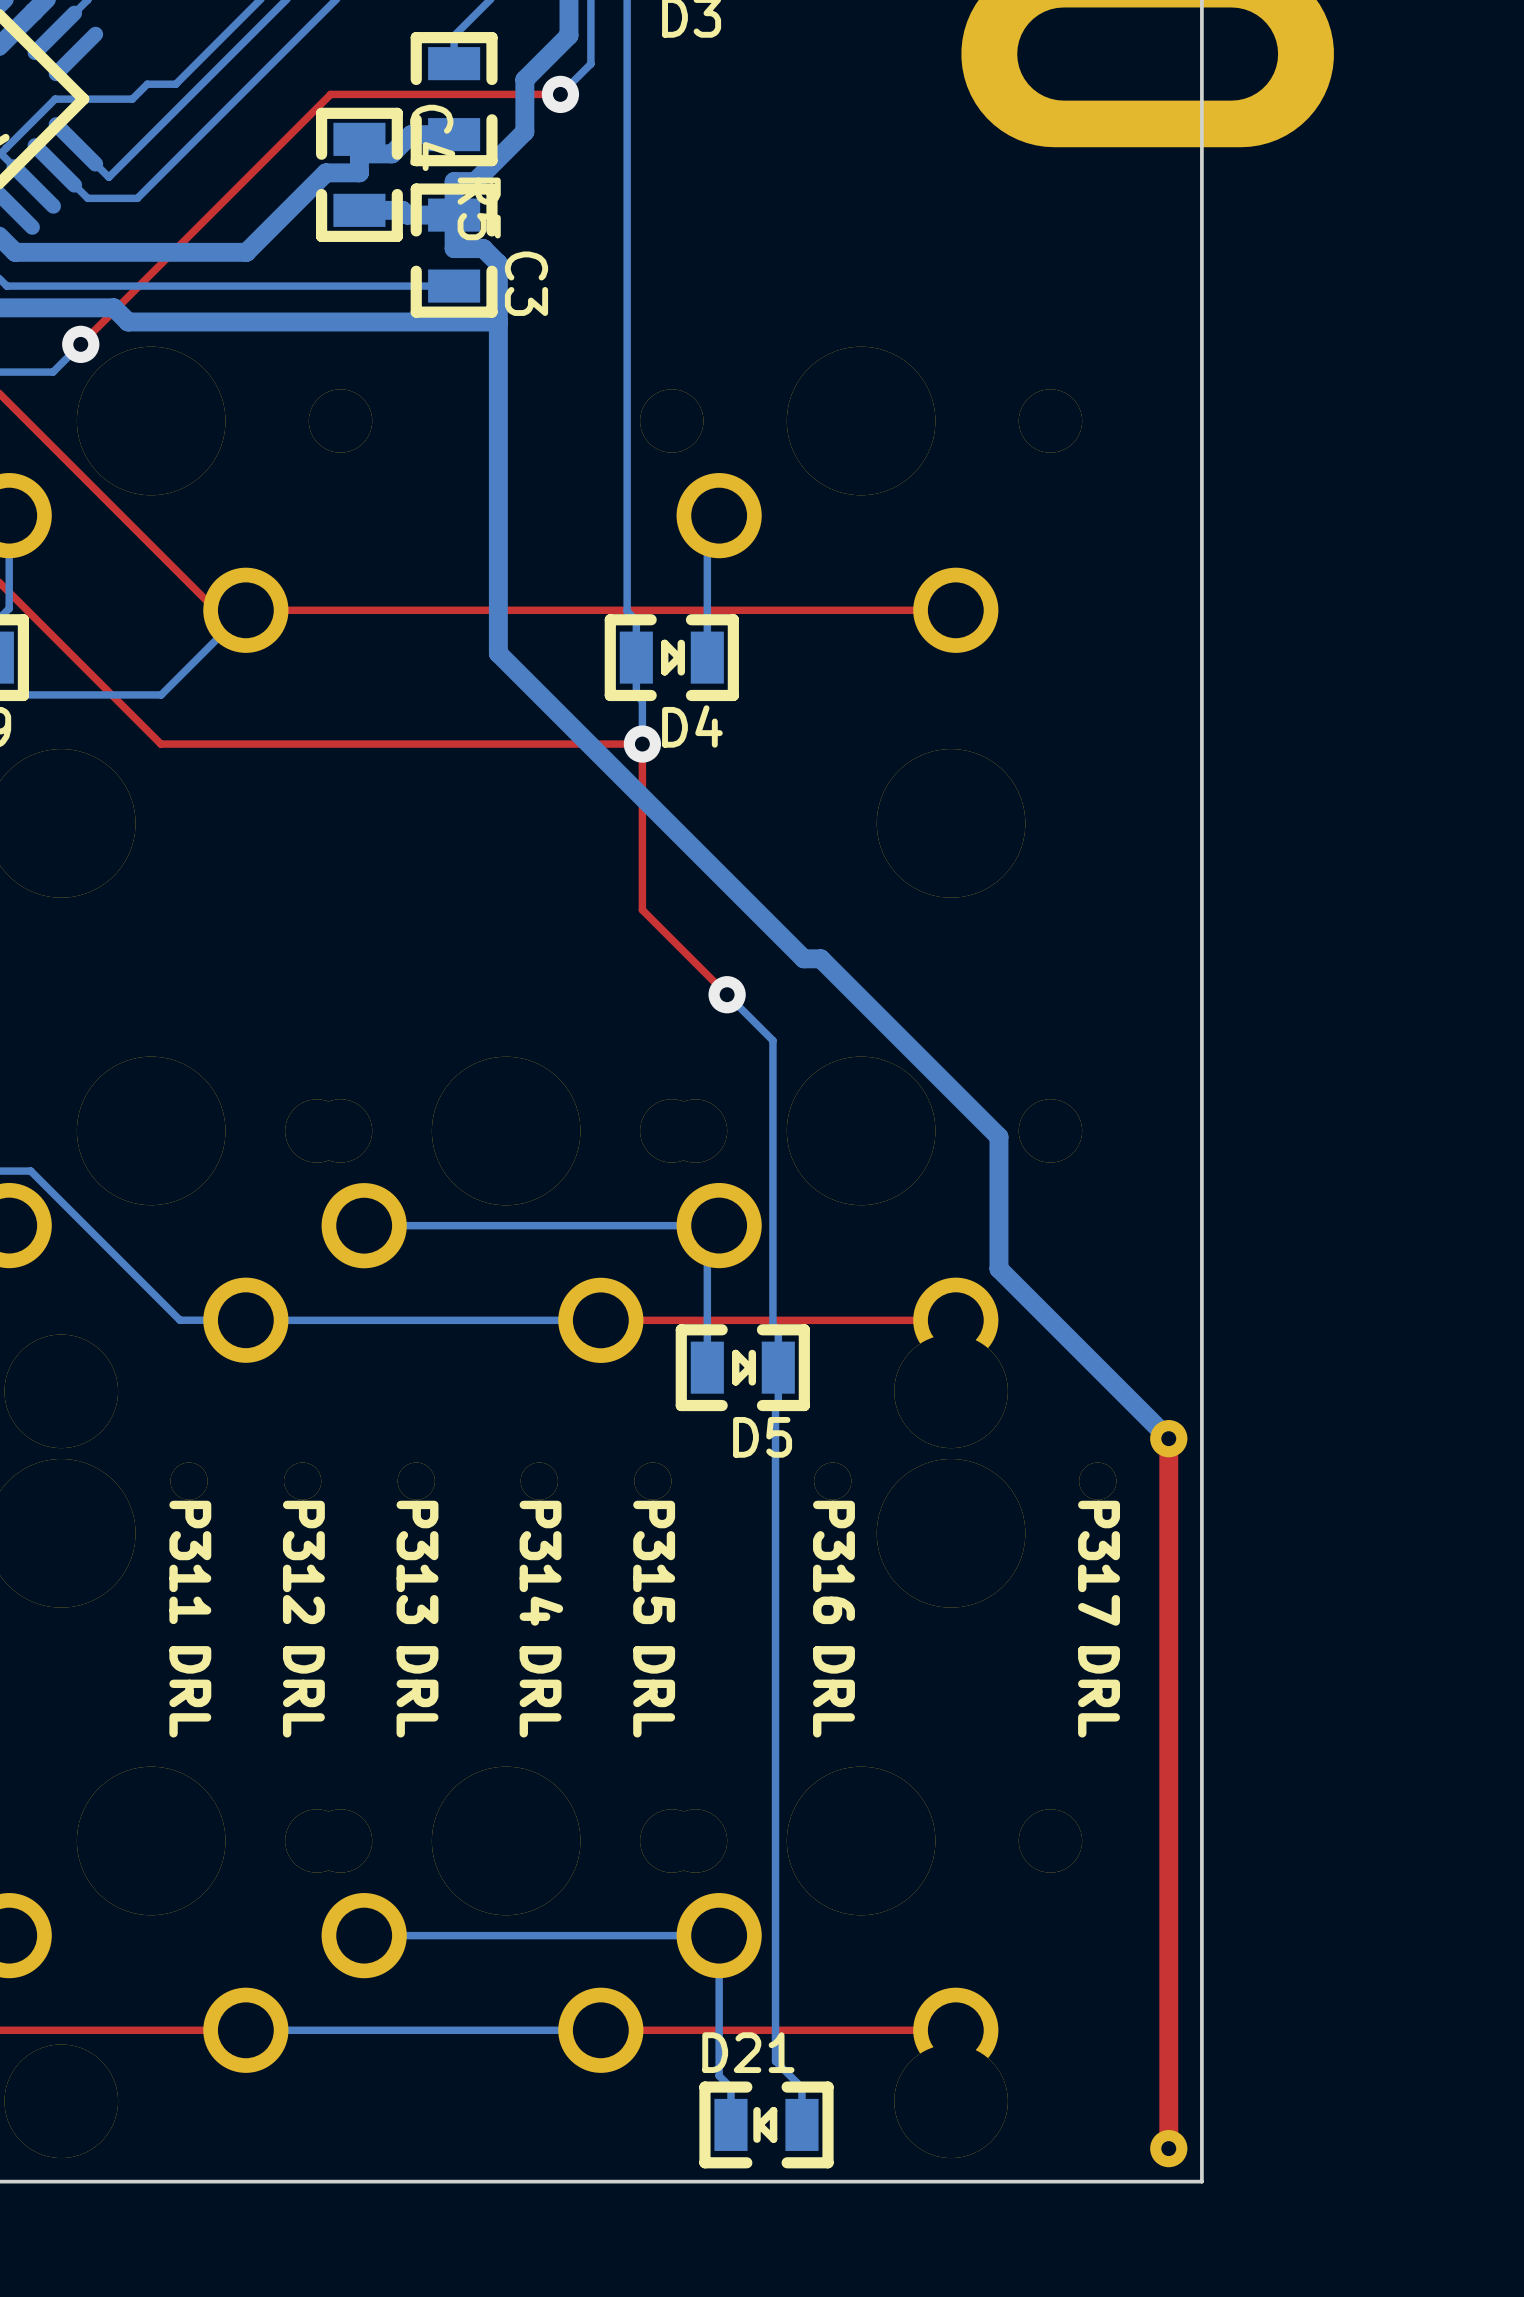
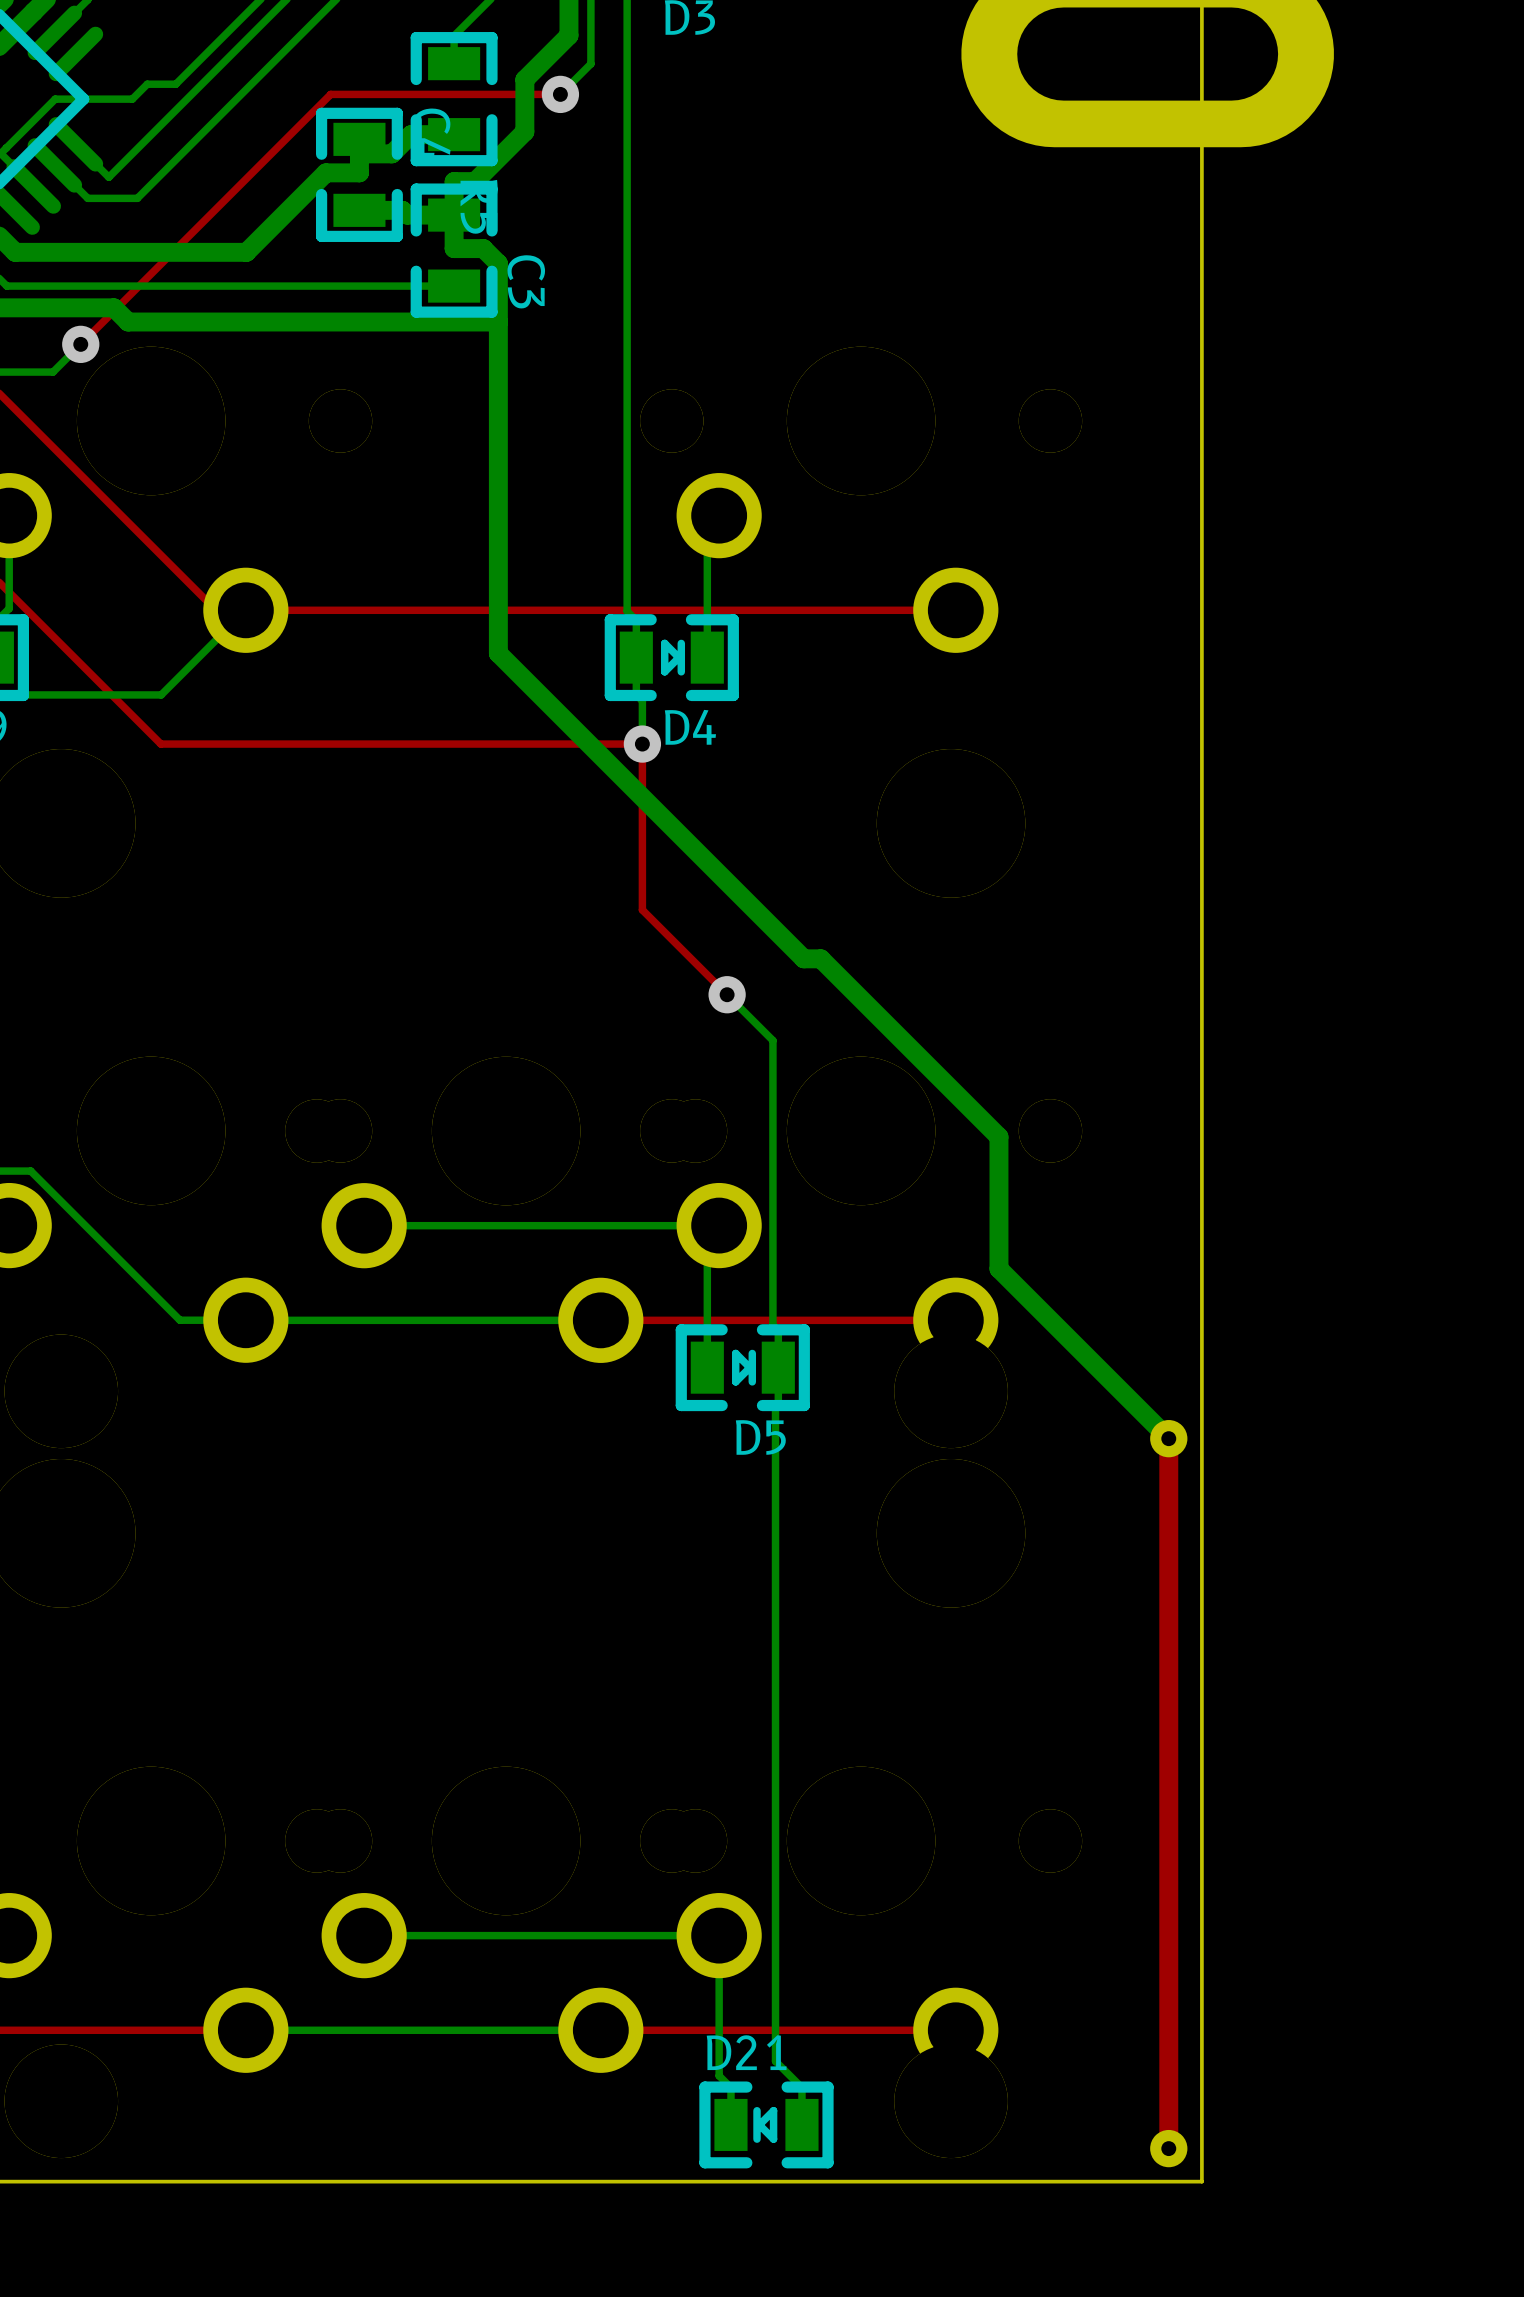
P311: DRL (189, 1481) -> none
P312: DRL (302, 1481) -> none
P313: DRL (416, 1481) -> none
P314: DRL (539, 1481) -> none
P315: DRL (652, 1481) -> none
P316: DRL (832, 1481) -> none
P317: DRL (1097, 1481) -> none

